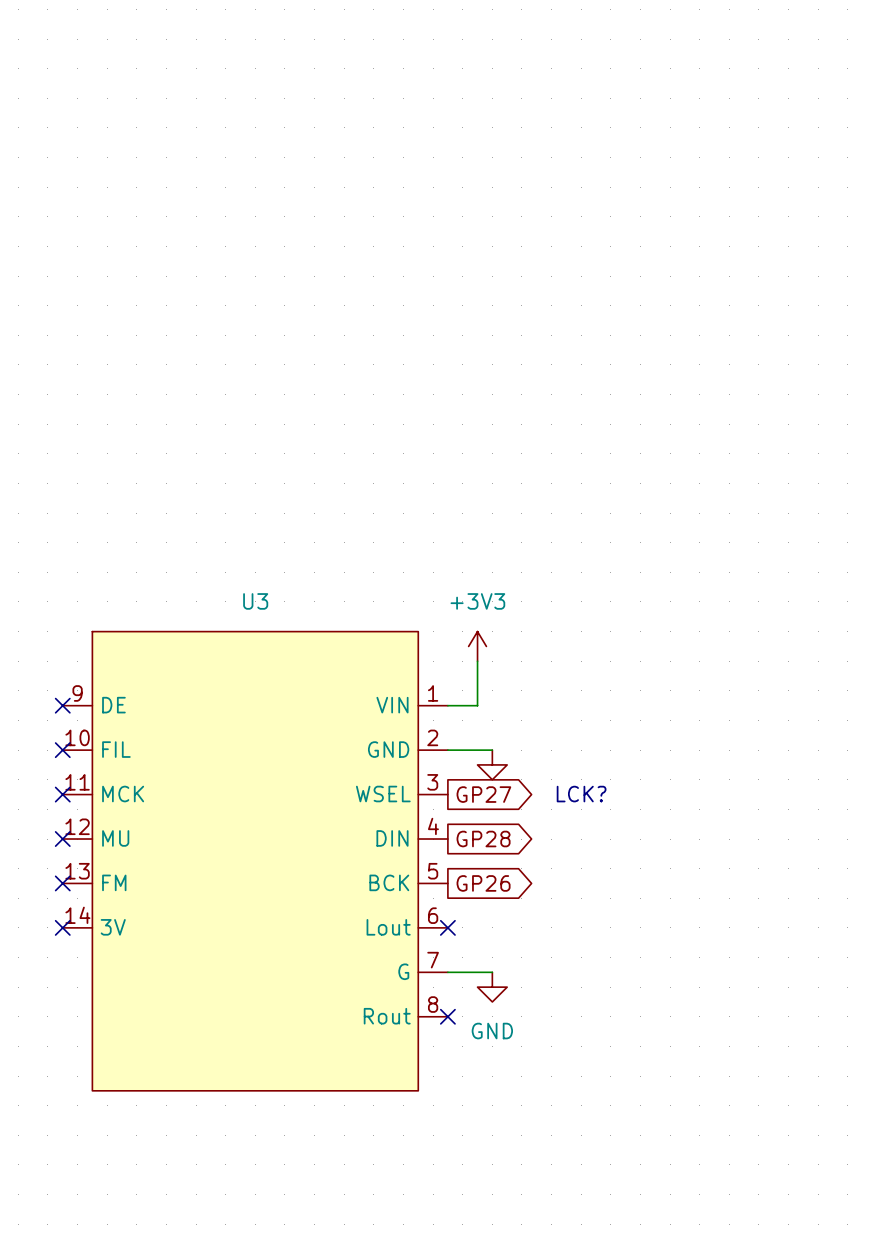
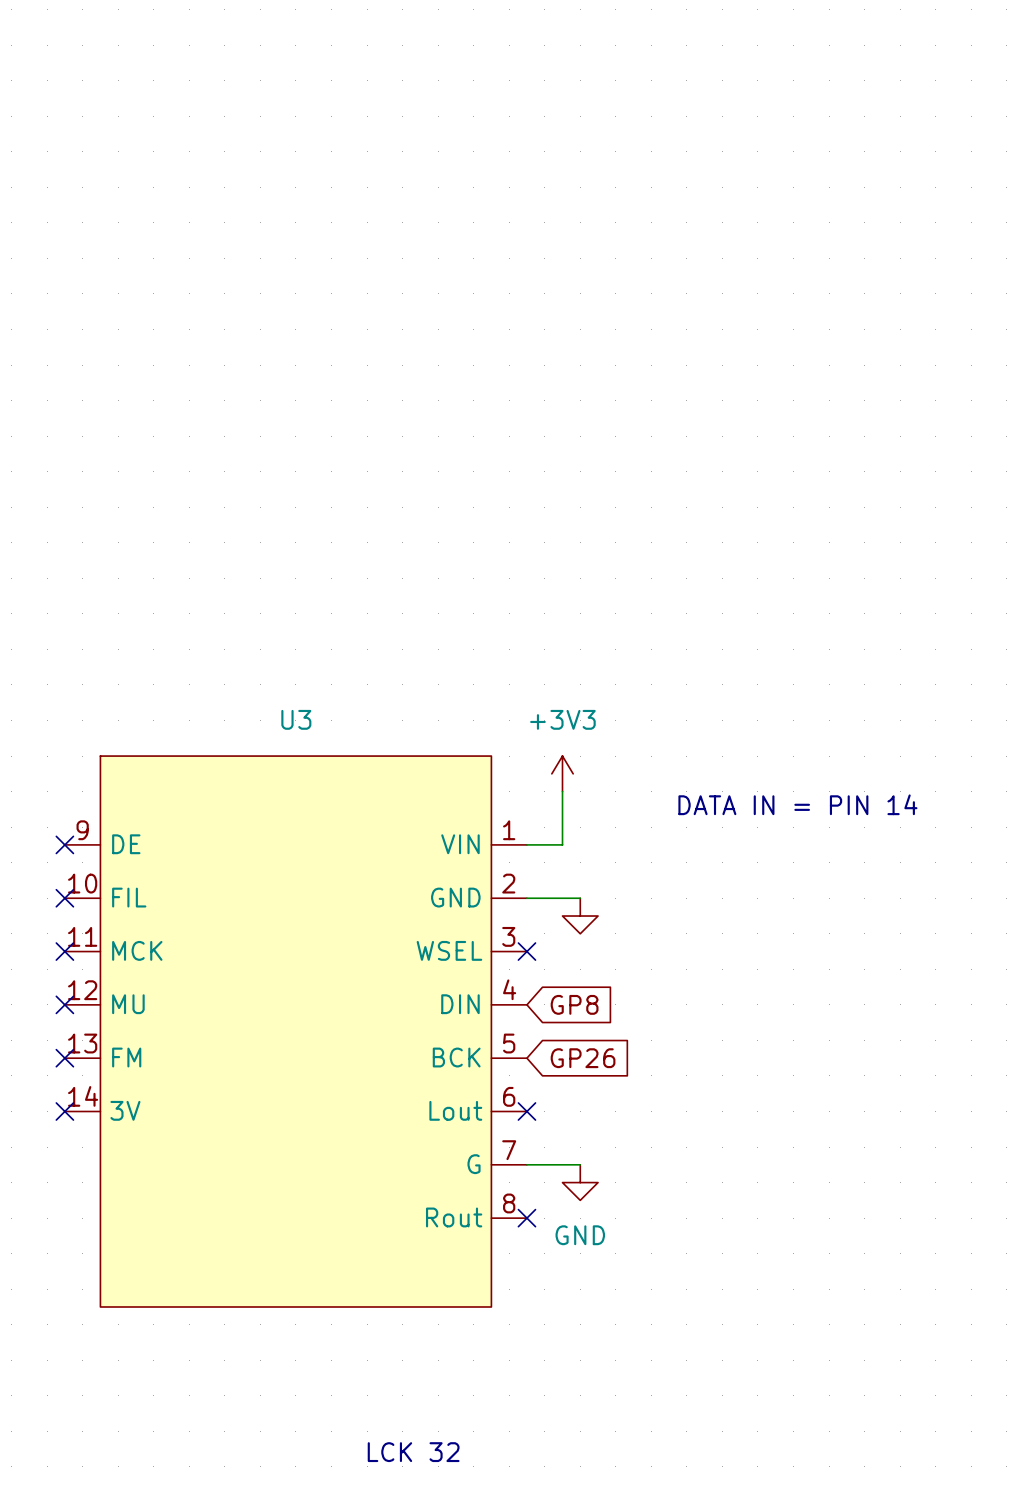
text: none -> DATA IN = PIN 14 (797, 804)
no-connect mark: none -> (526, 951)
global label: GP27 (483, 794) -> none
text: LCK? (581, 794) -> none
global label shape: output (483, 839) -> input (574, 1004)
global label: GP28 (483, 839) -> GP8 (574, 1004)
global label shape: output (483, 883) -> input (583, 1058)
text: none -> LCK 32 (413, 1452)

